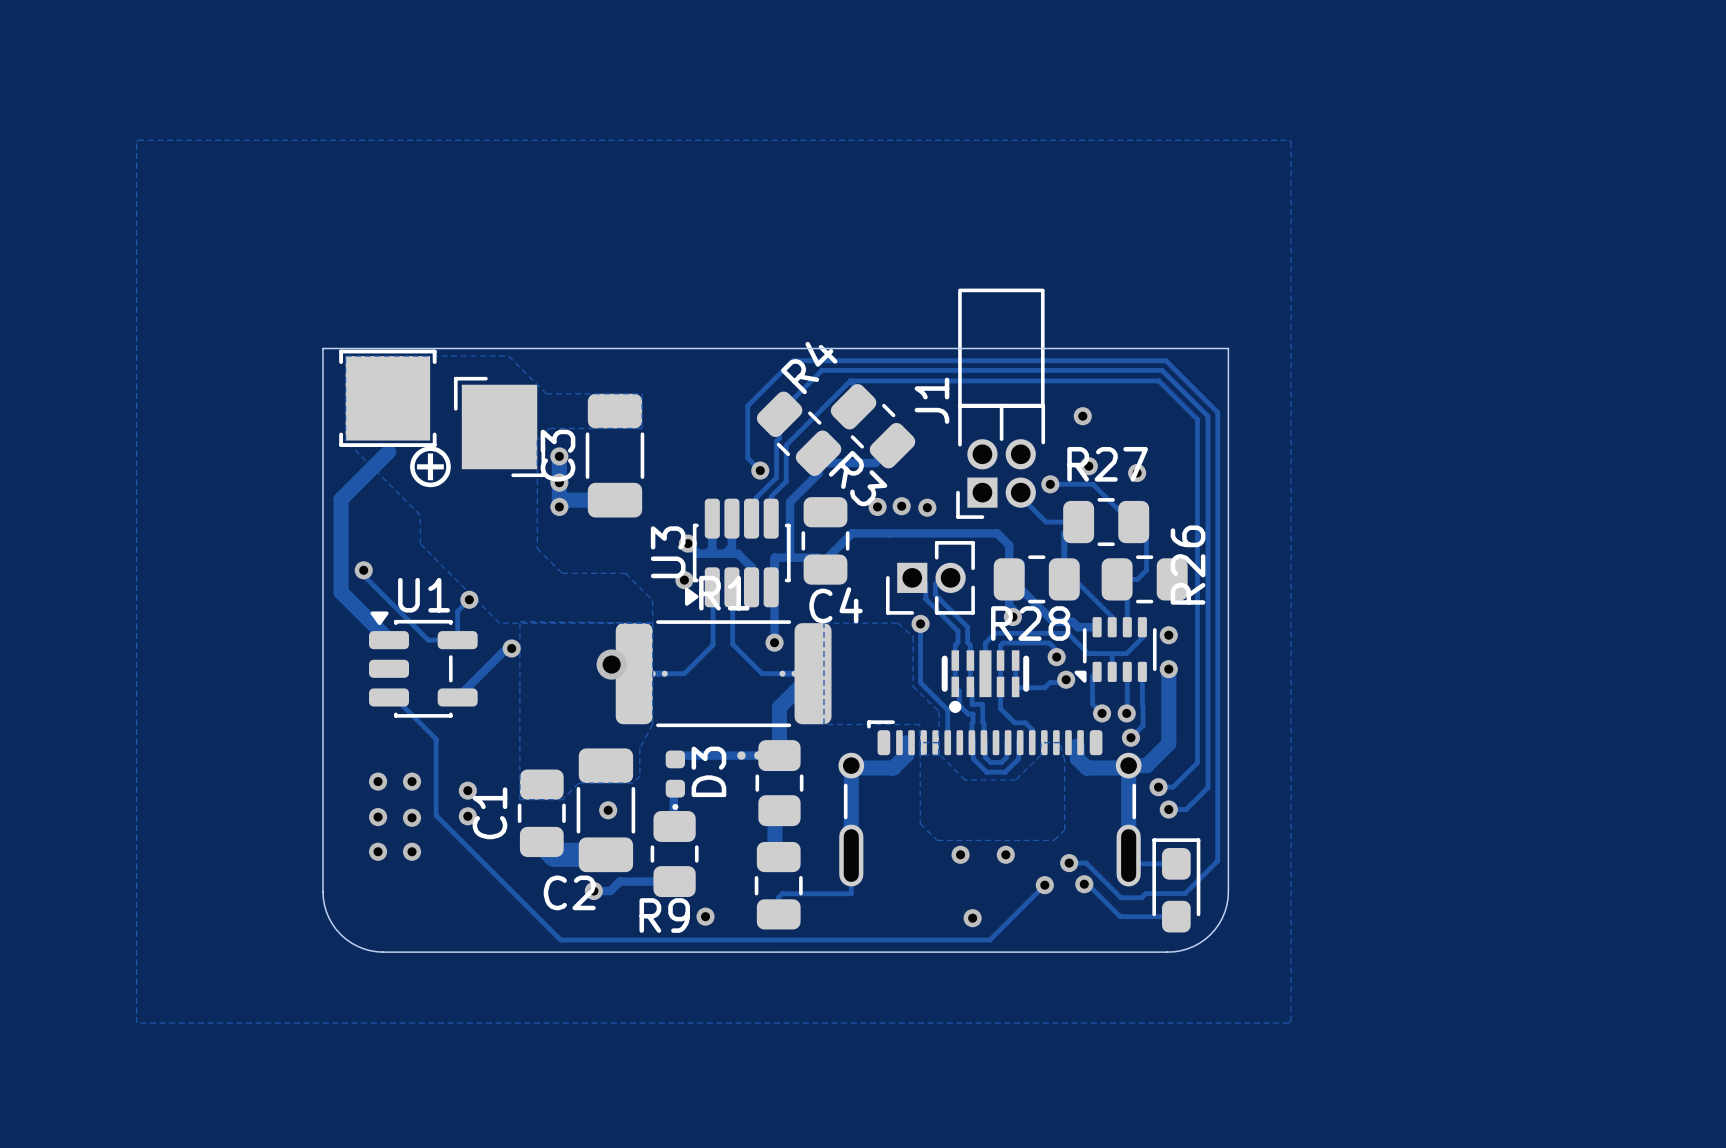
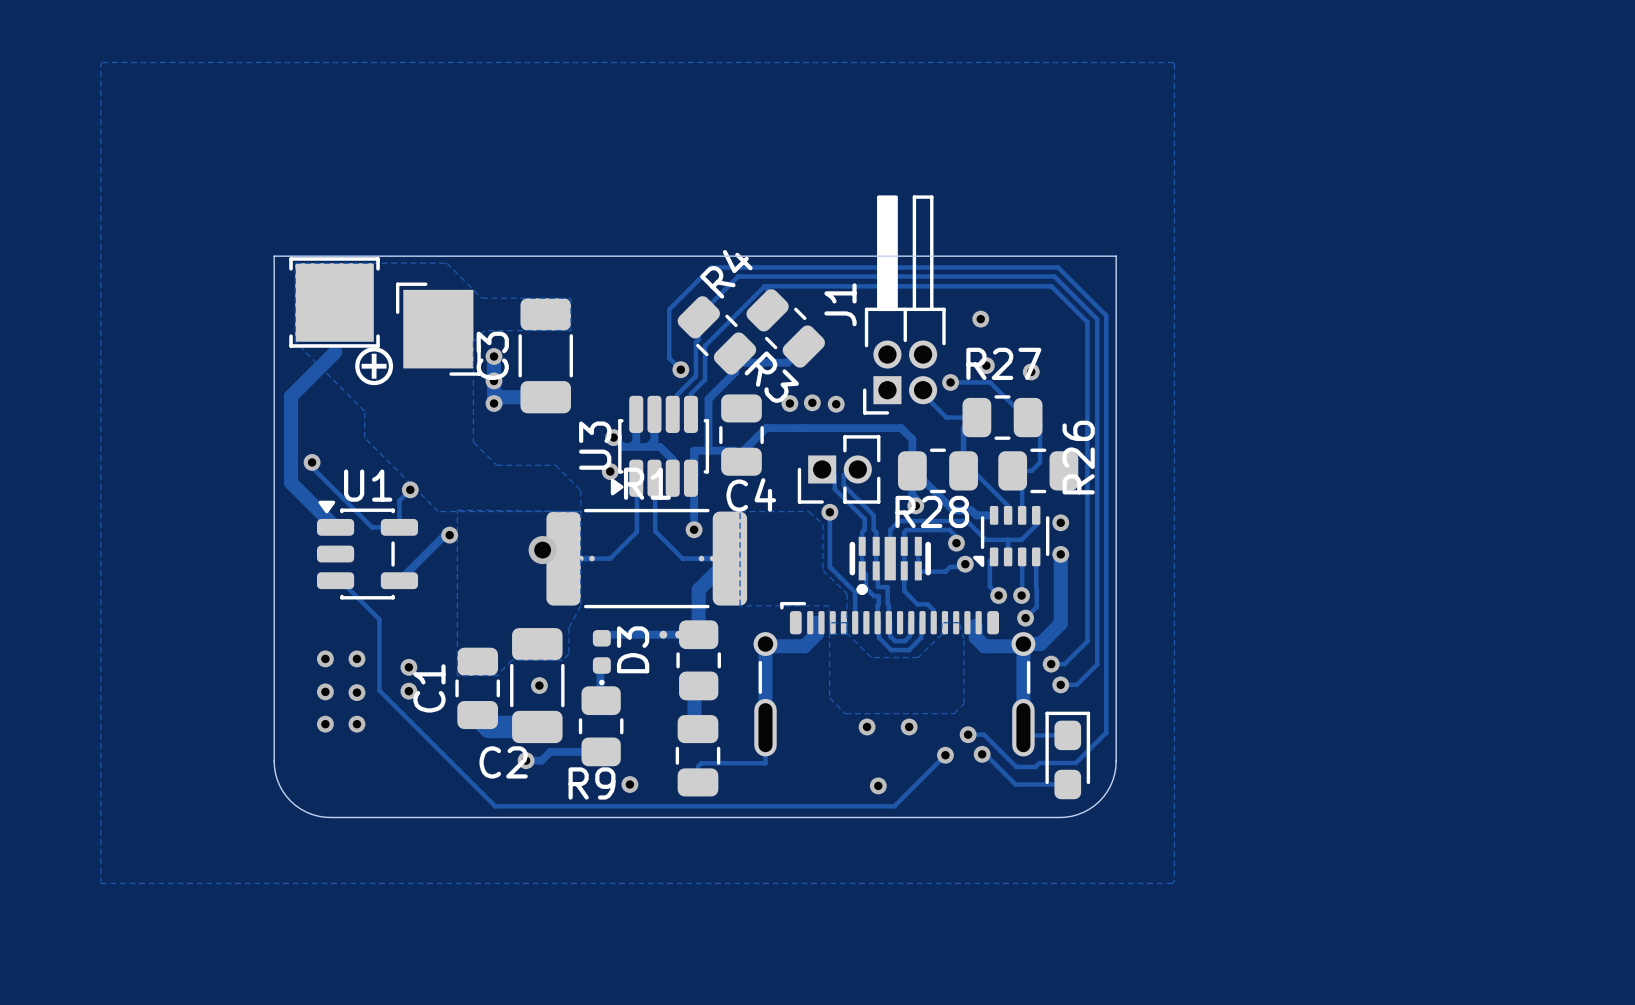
J1 footprint: [956, 288, 1046, 519] -> [863, 195, 946, 415]

